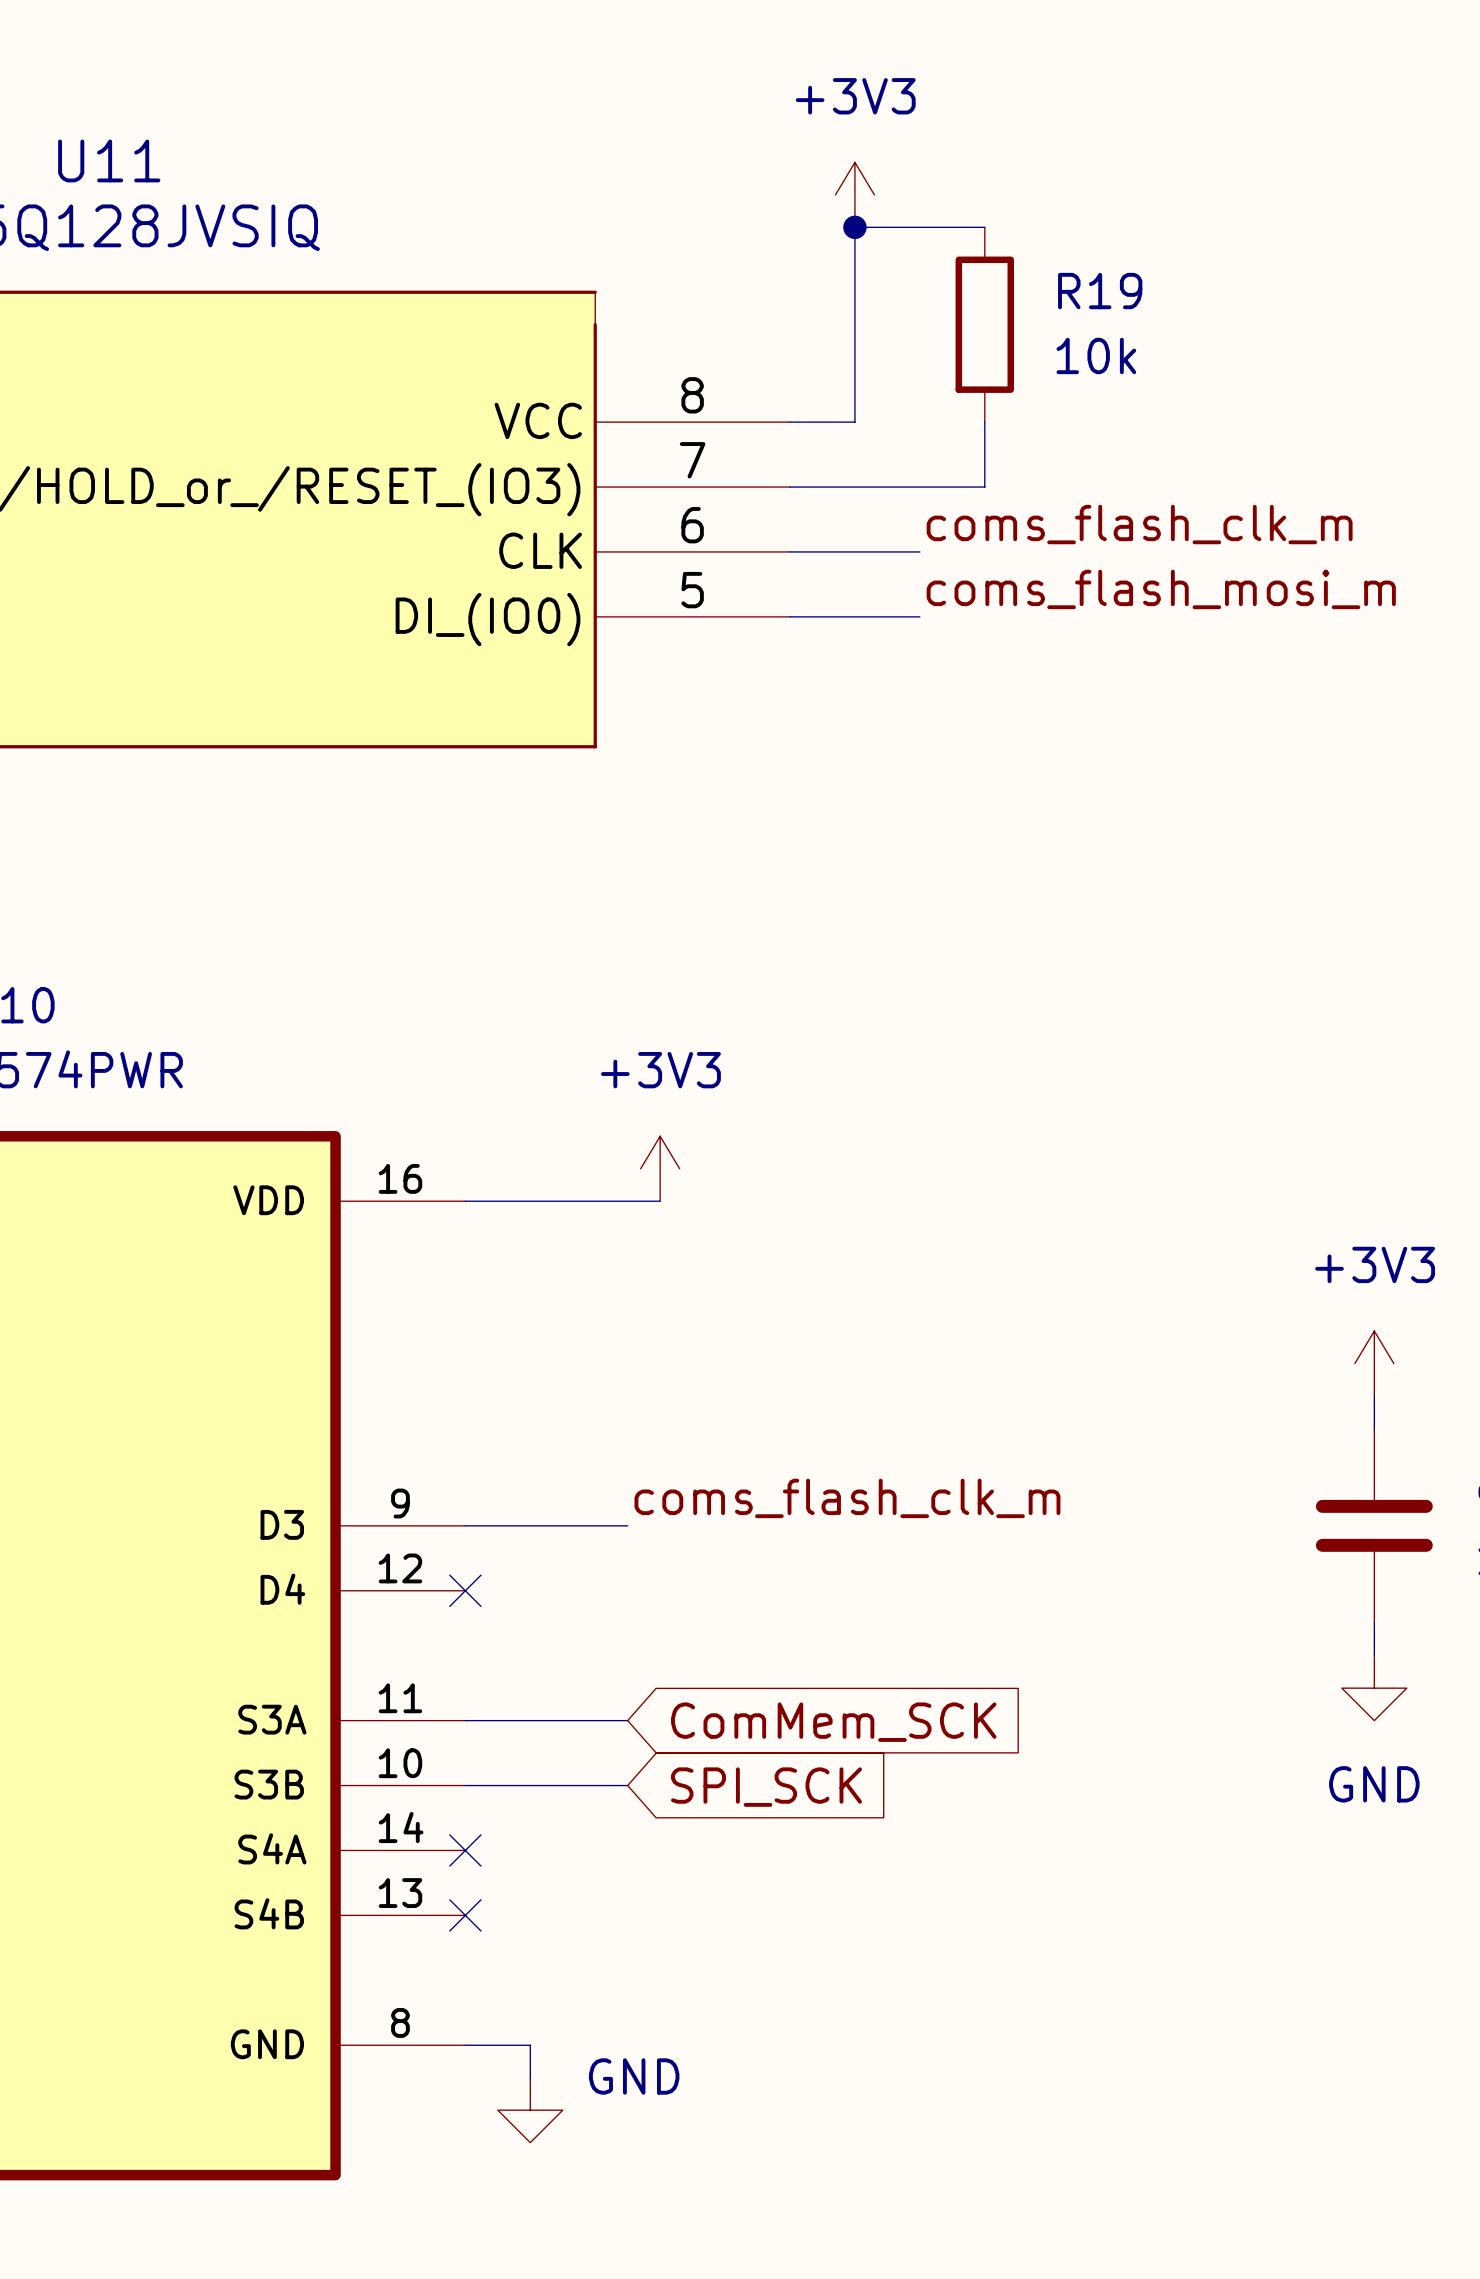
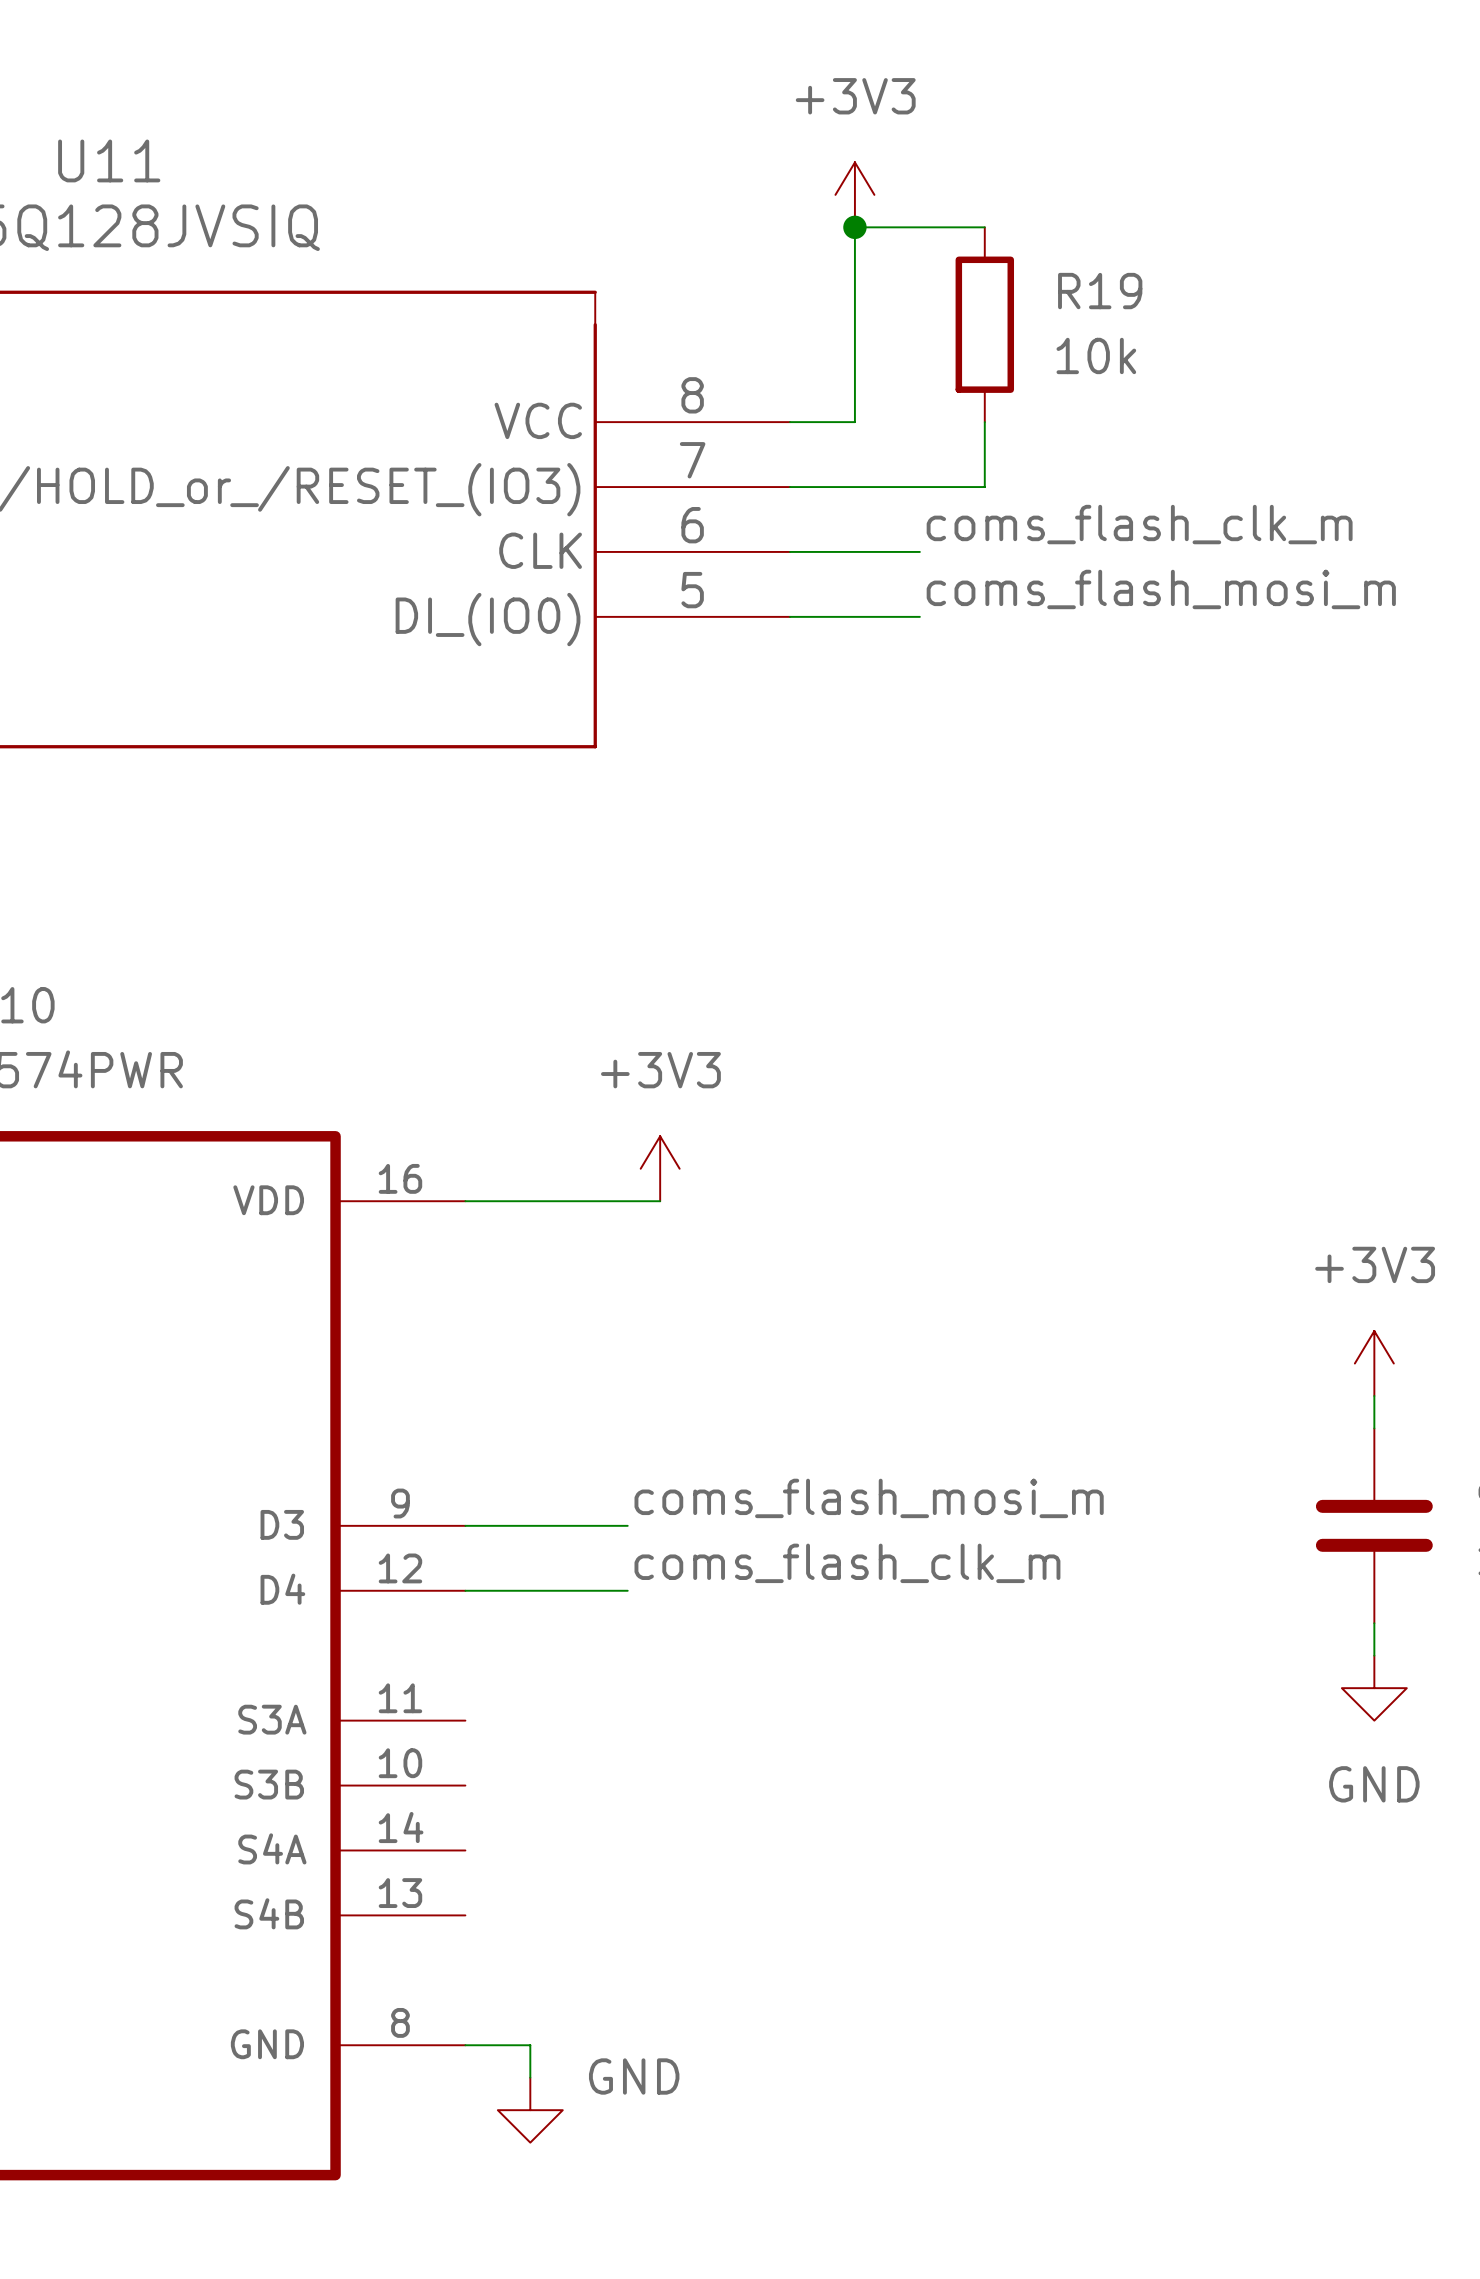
label: coms_flash_clk_m (847, 1498) -> coms_flash_mosi_m (869, 1498)
label: none -> coms_flash_clk_m (847, 1563)
no-connect mark: (465, 1590) -> none
wire: (465, 1720) (627, 1720) -> (465, 1590) (627, 1590)
global label: ComMem_SCK (833, 1722) -> none
wire: (465, 1785) (627, 1785) -> none
global label: SPI_SCK (766, 1787) -> none
no-connect mark: (465, 1850) -> none
no-connect mark: (465, 1915) -> none

